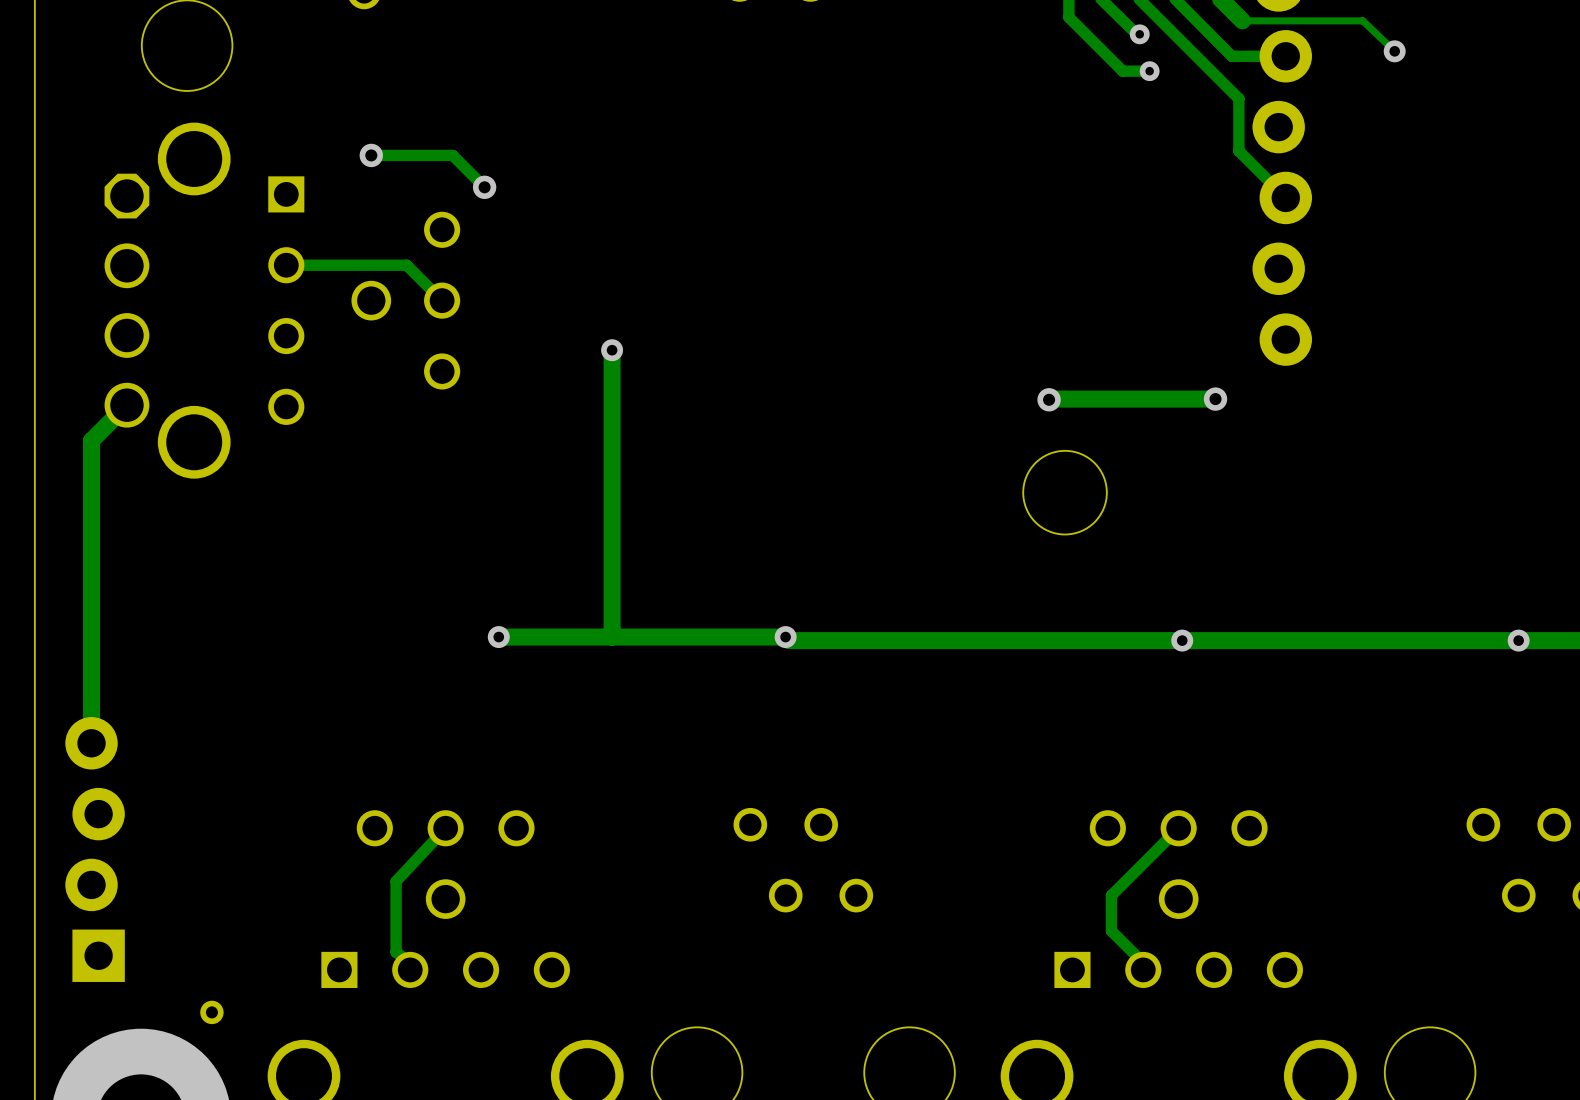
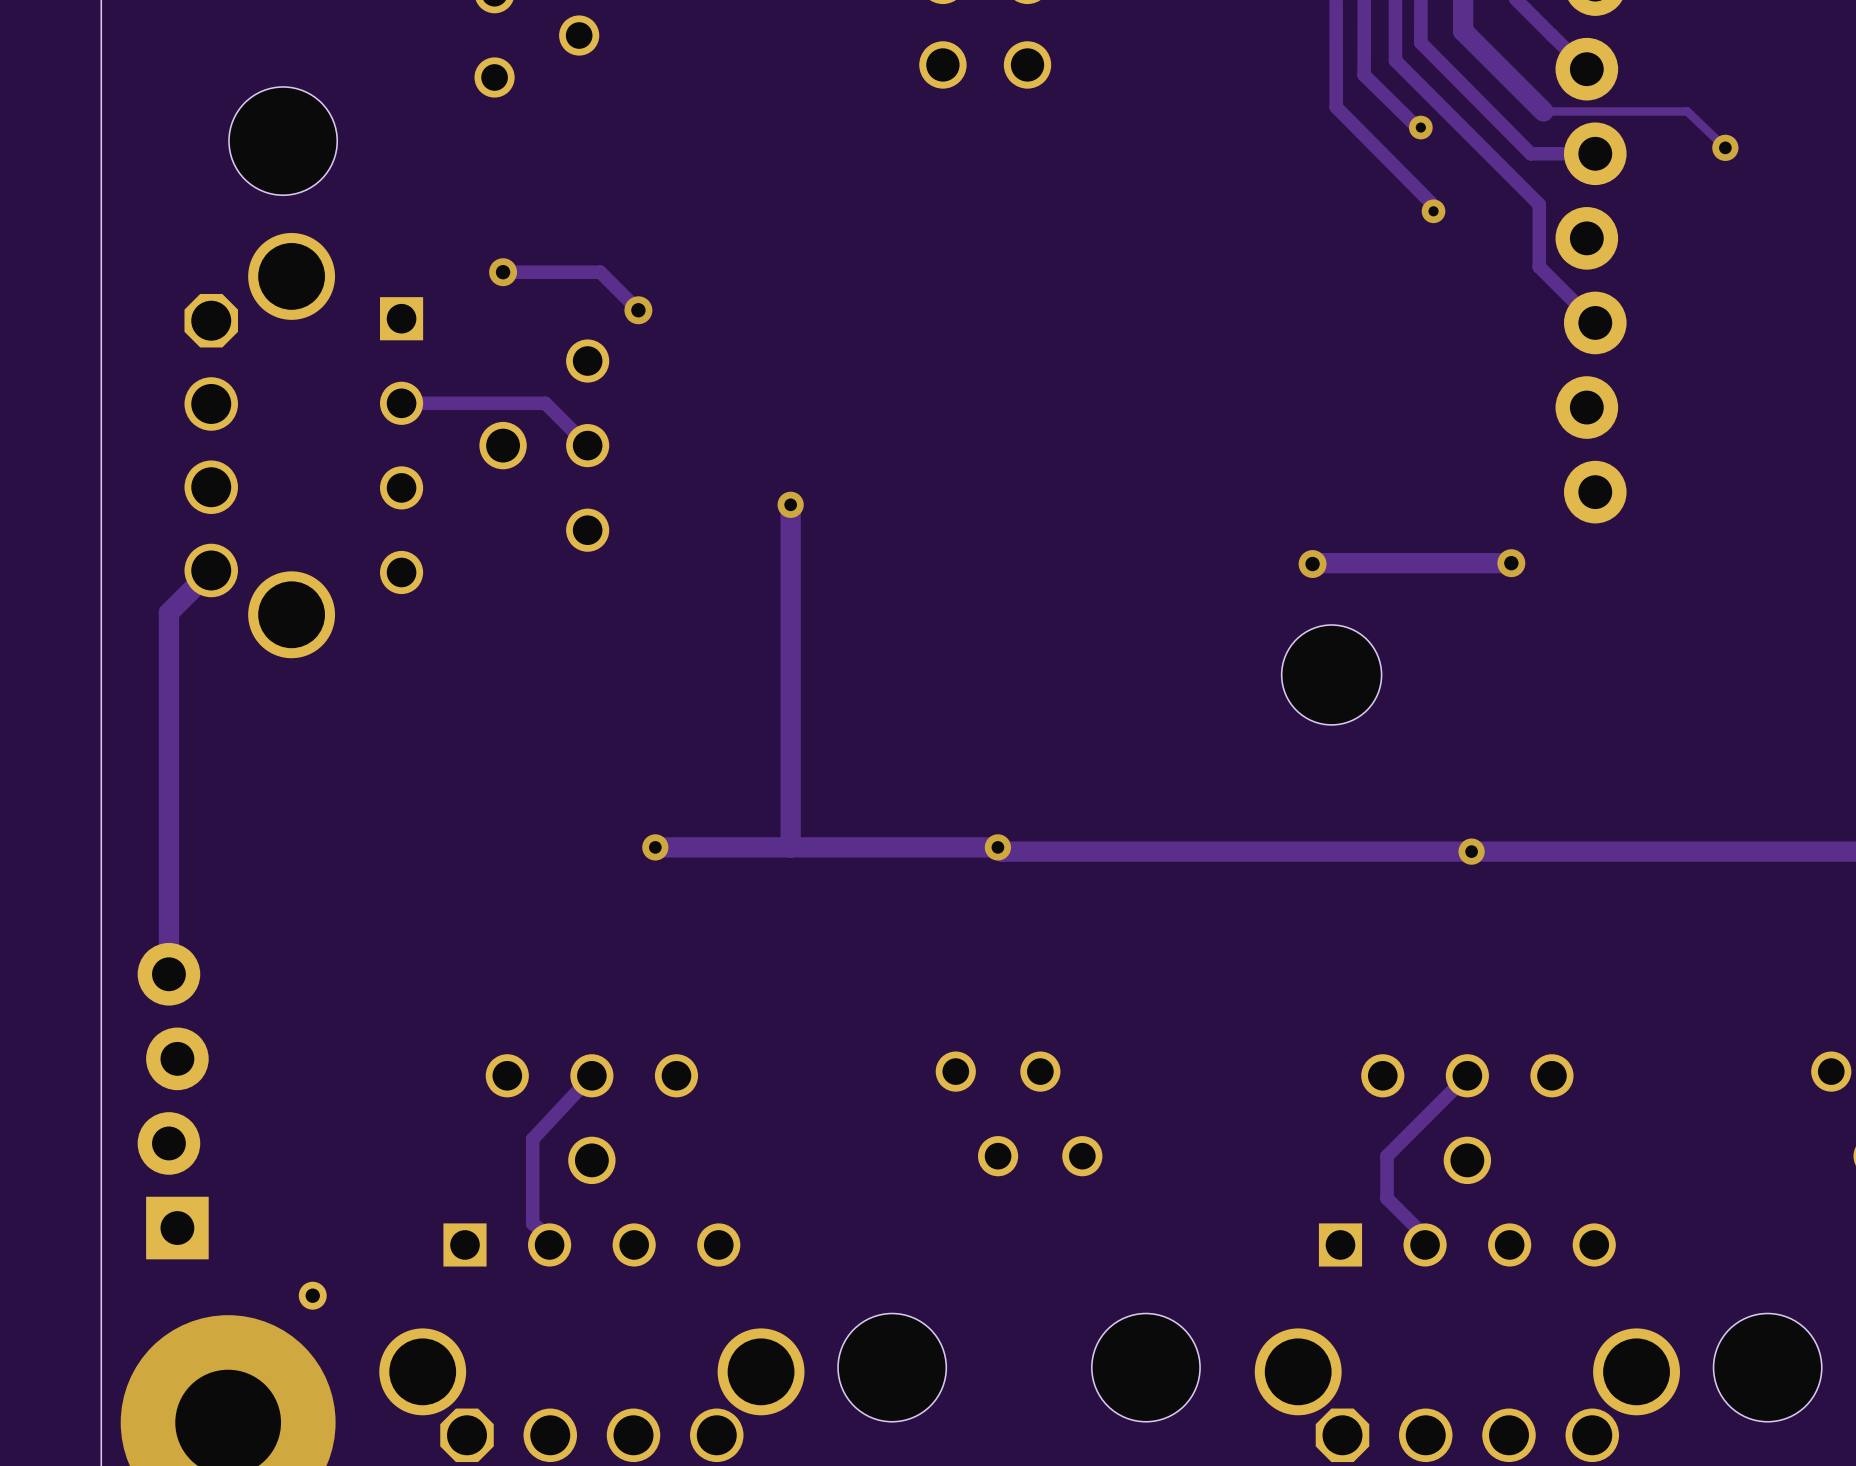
track: (1068, 17) (1122, 71) (1149, 71) -> (1336, 107) (1431, 202) (1433, 211)
via position: (1149, 71) -> (1433, 211)

